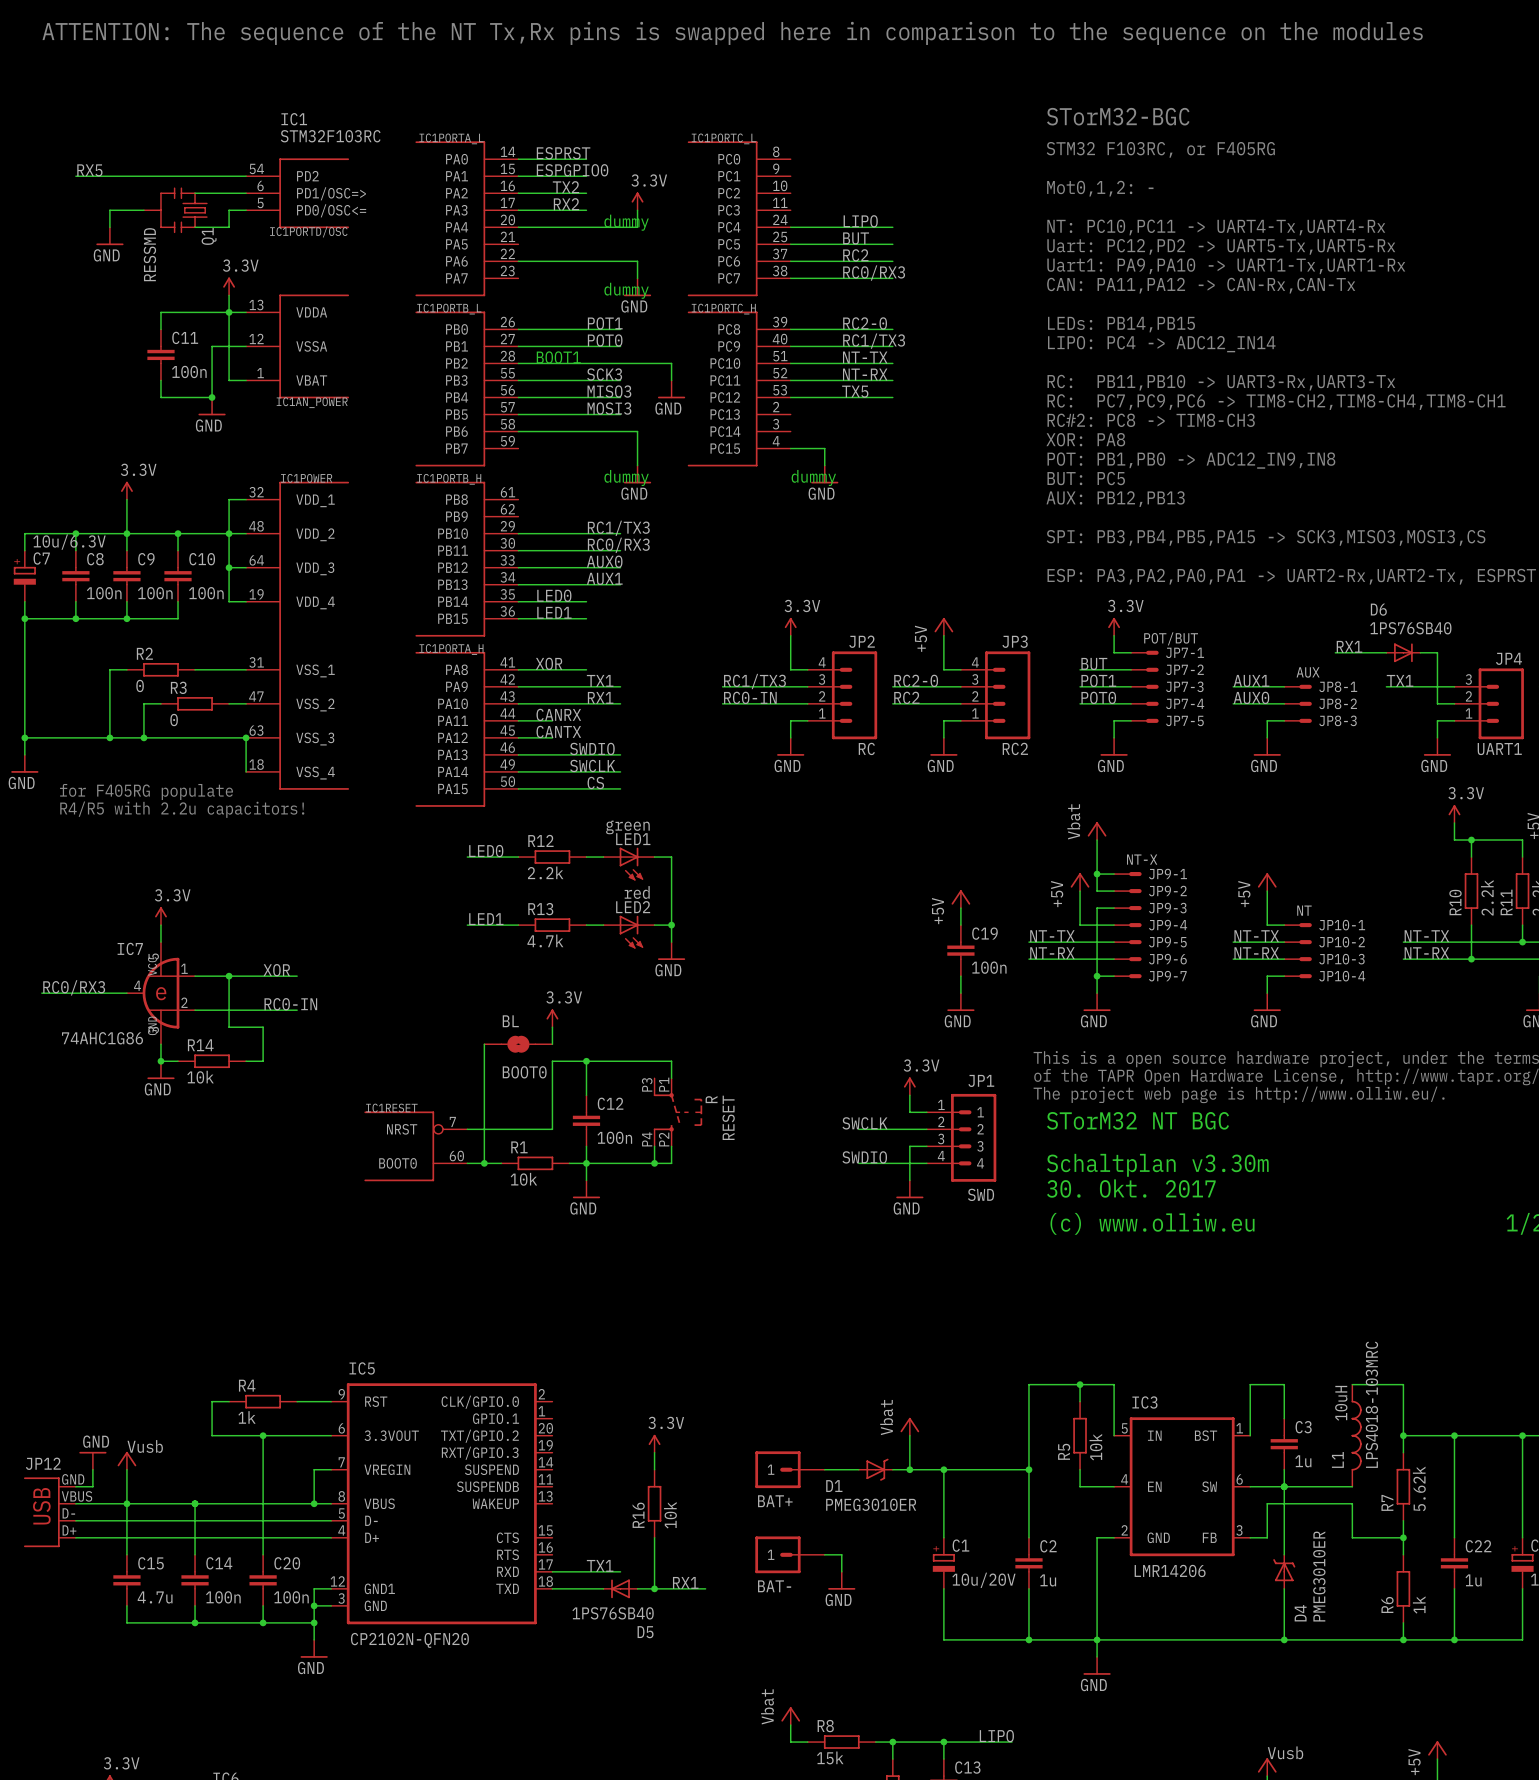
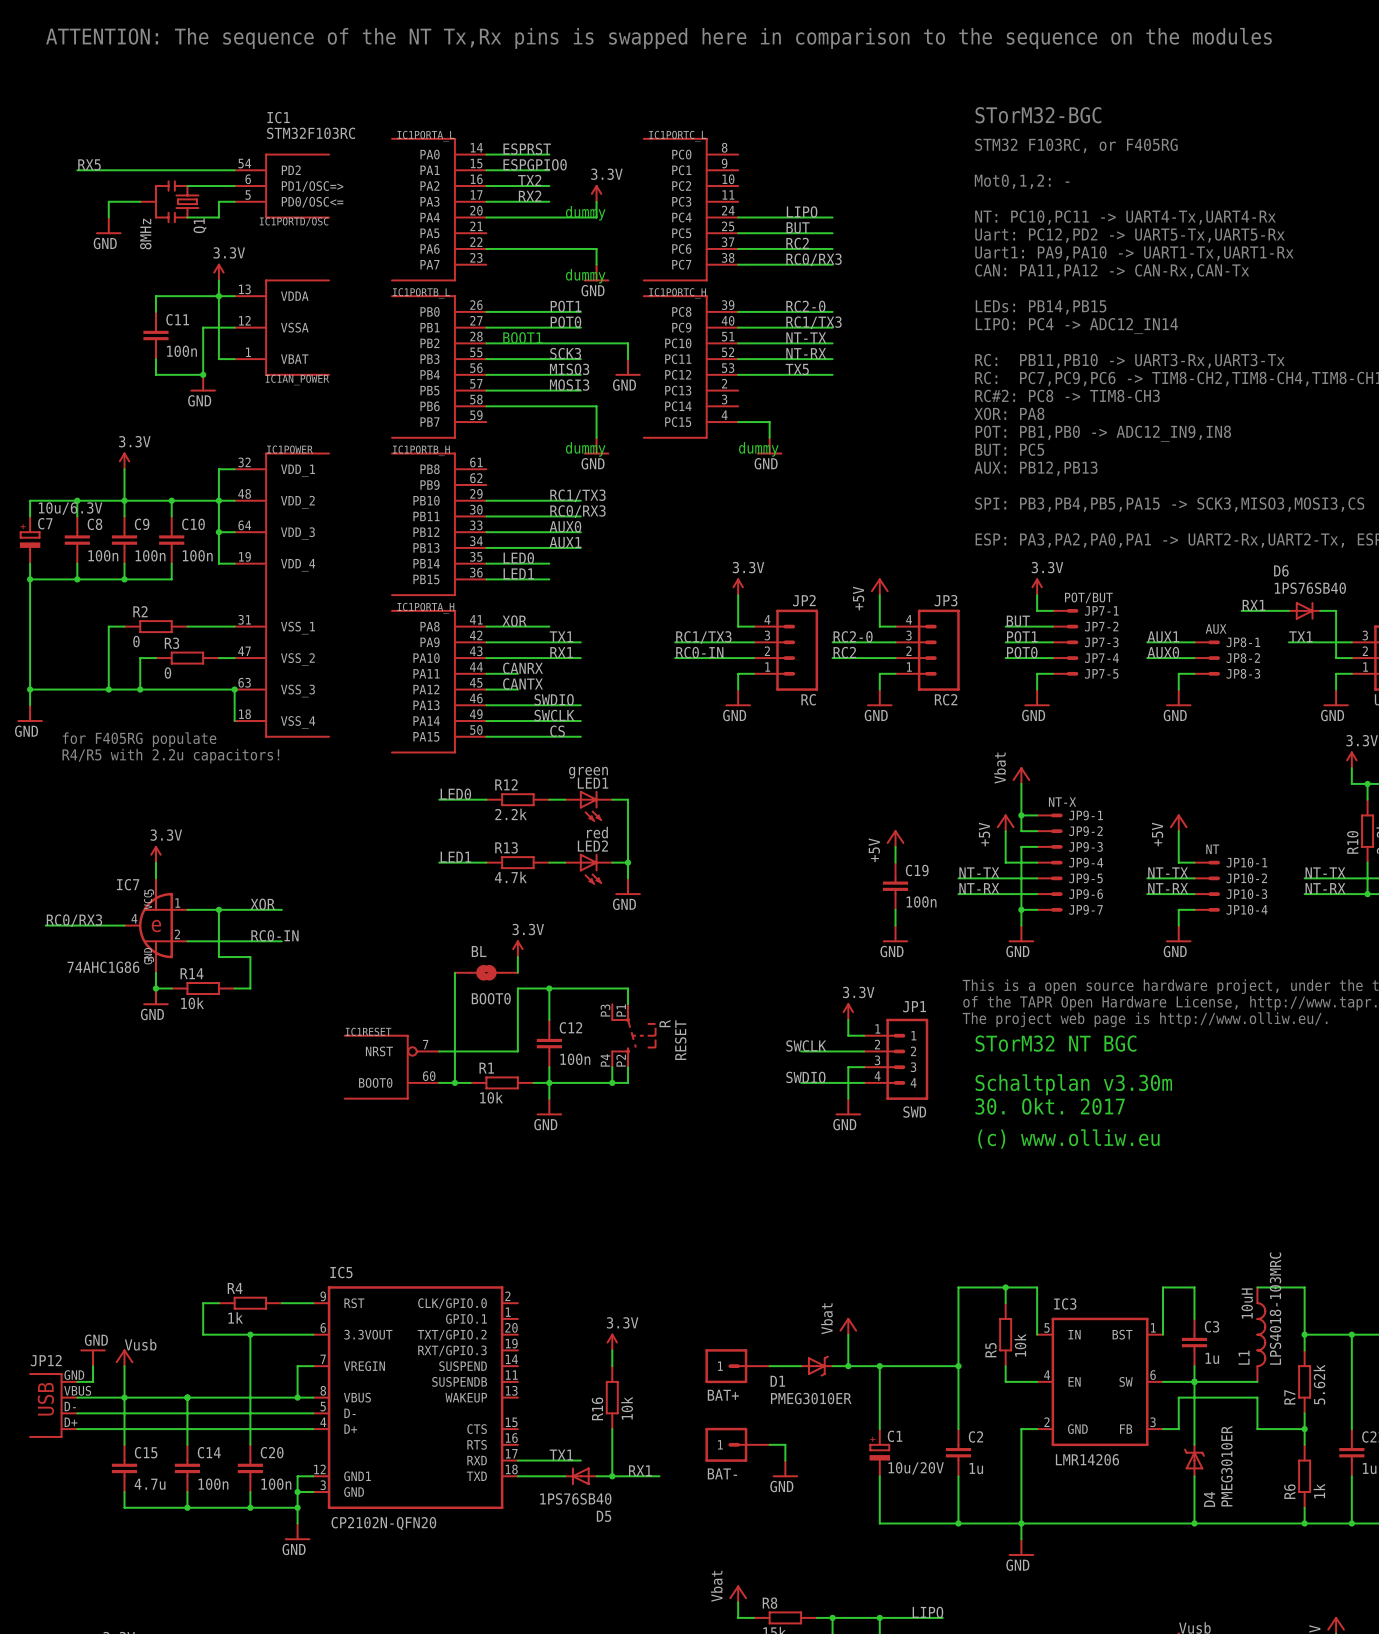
Q1 value: RESSMD (149, 254) -> 8MHz (145, 234)

